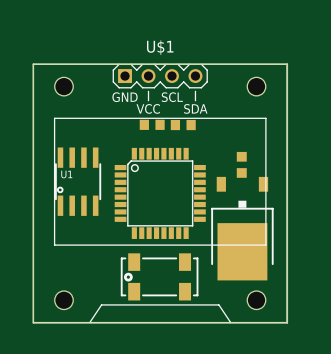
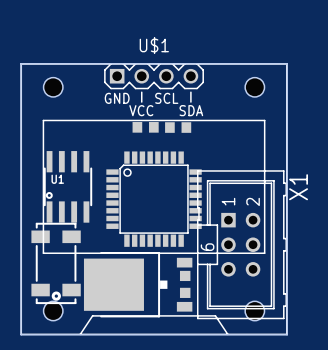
part position: (241, 164) -> (185, 284)
part rotation: 0° (242, 228) -> 90° clockwise (138, 284)
part position: (242, 228) -> (138, 284)
X1: none -> (241, 244)
part rotation: 0° (159, 276) -> 90° counterclockwise (56, 263)
part position: (159, 276) -> (56, 263)

